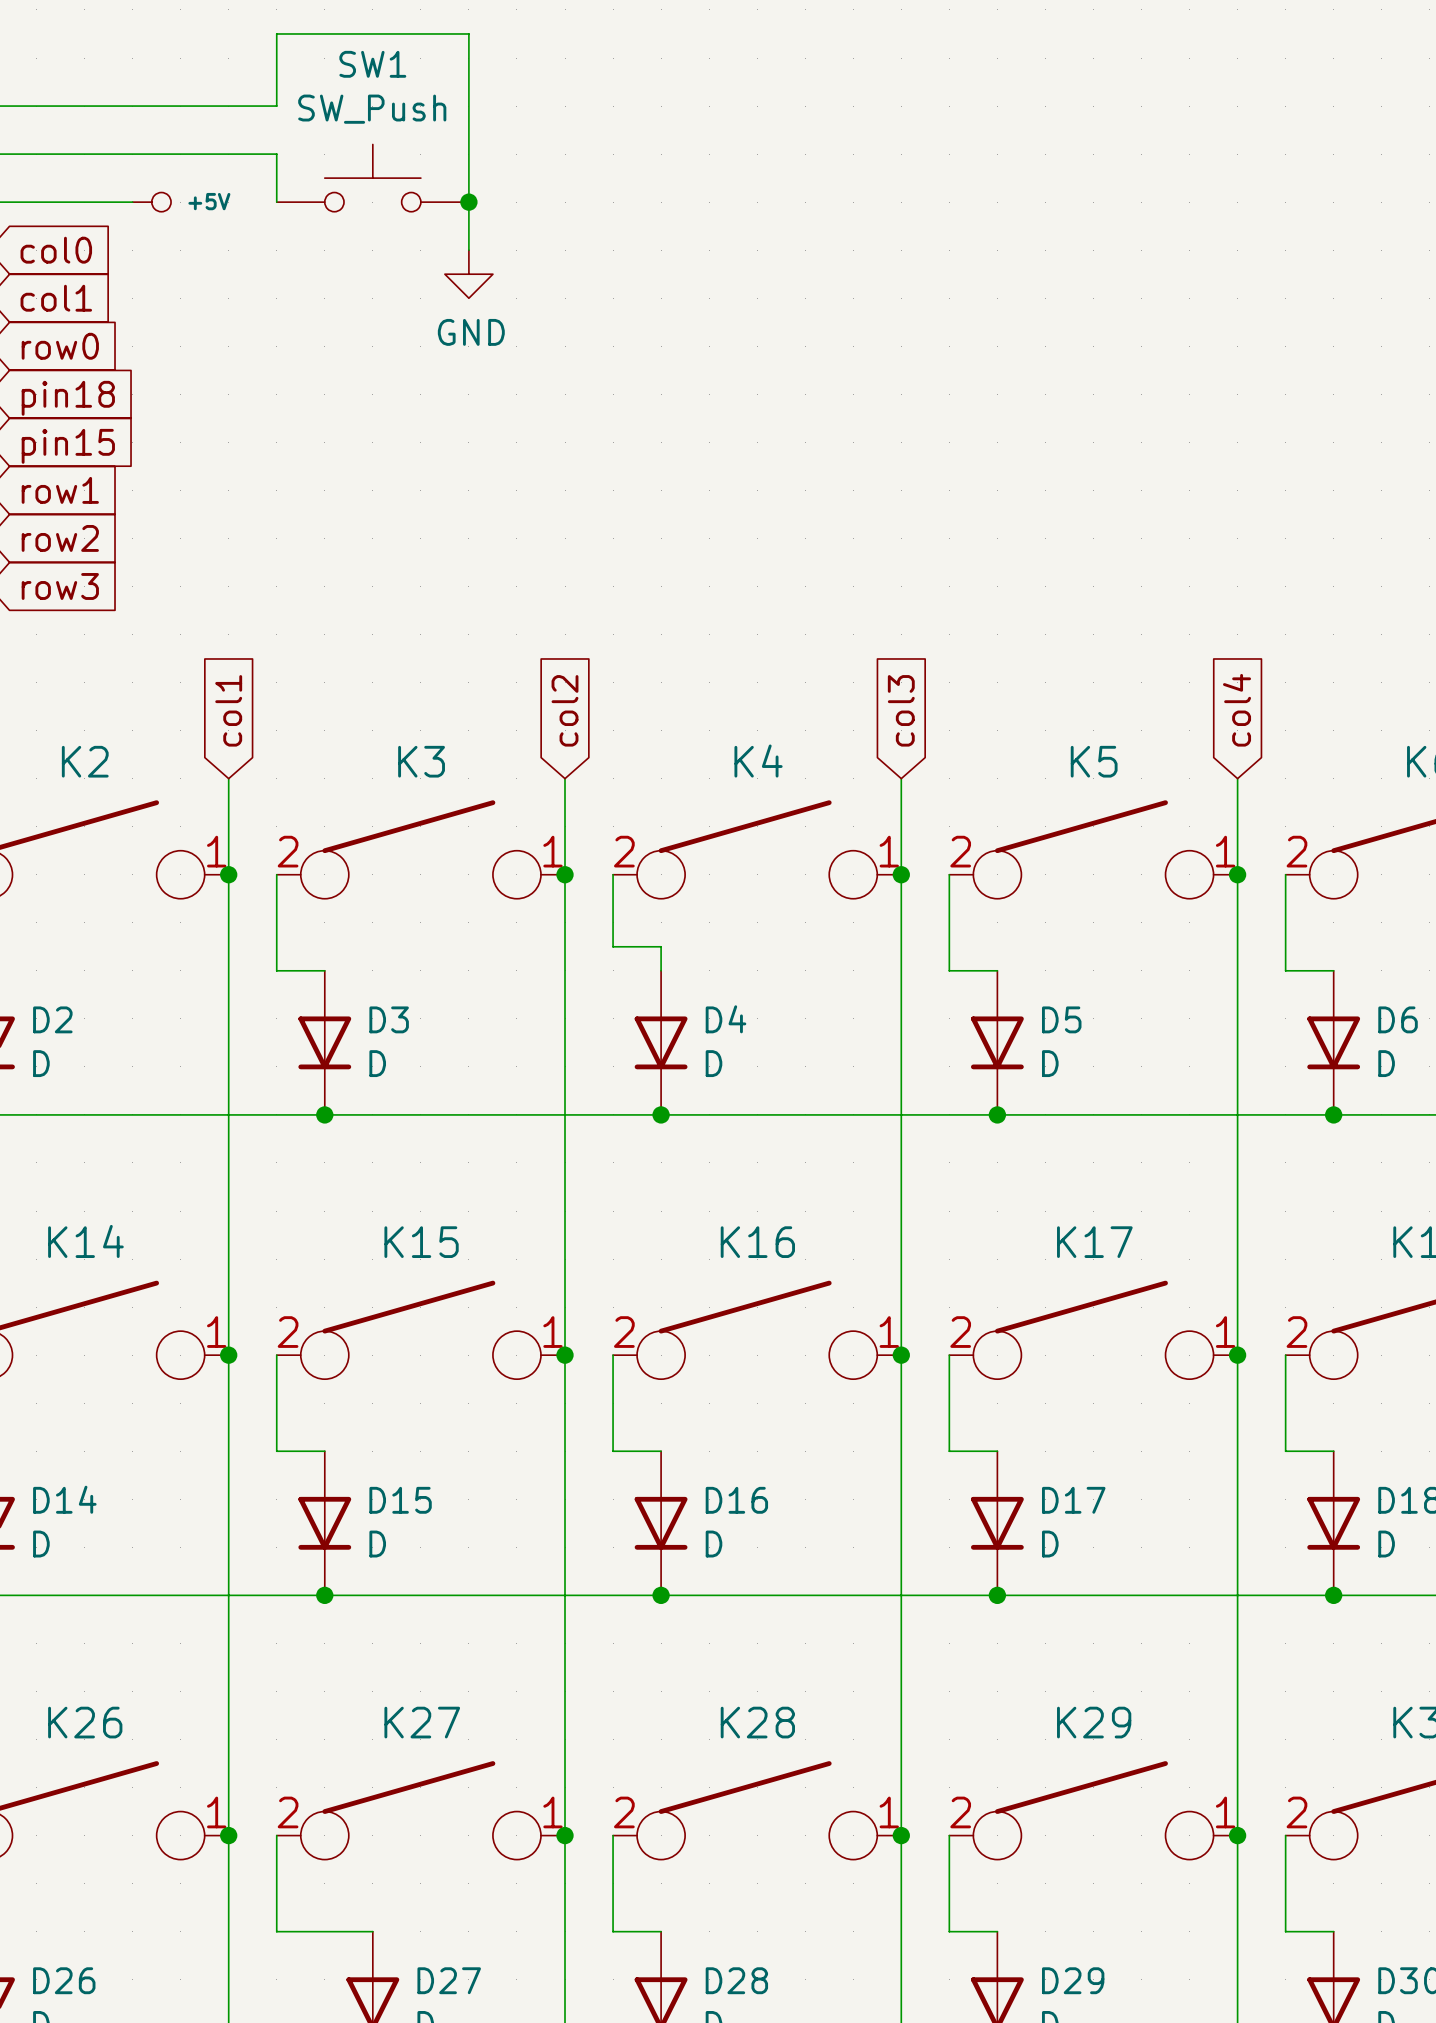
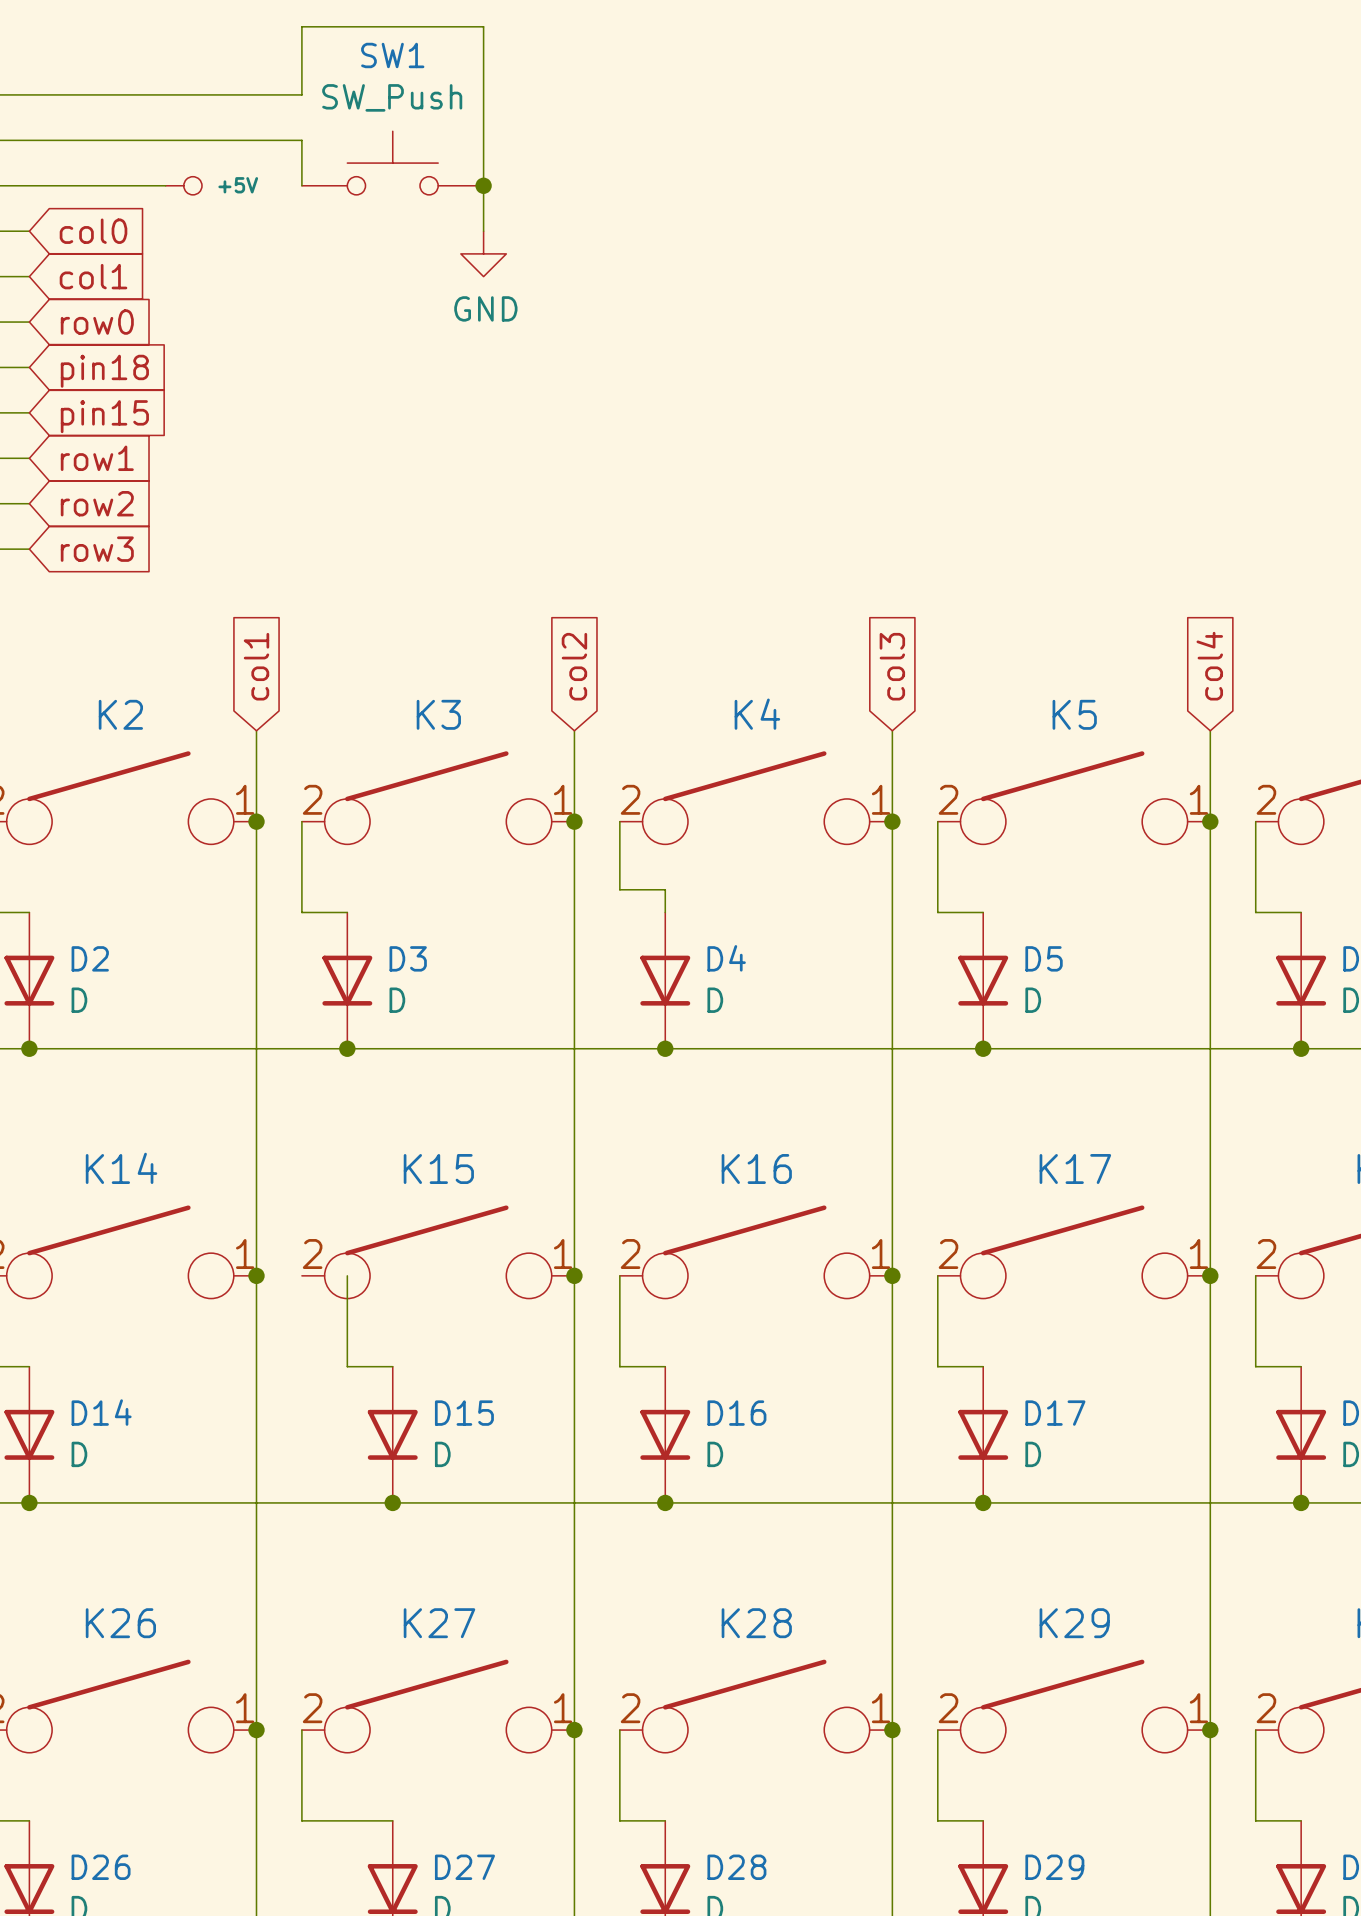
wire: (276, 1355) (276, 1451) (324, 1451) -> (347, 1275) (347, 1366) (392, 1366)
D15 position: (324, 1523) -> (392, 1434)
junction position: (324, 1595) -> (392, 1502)

